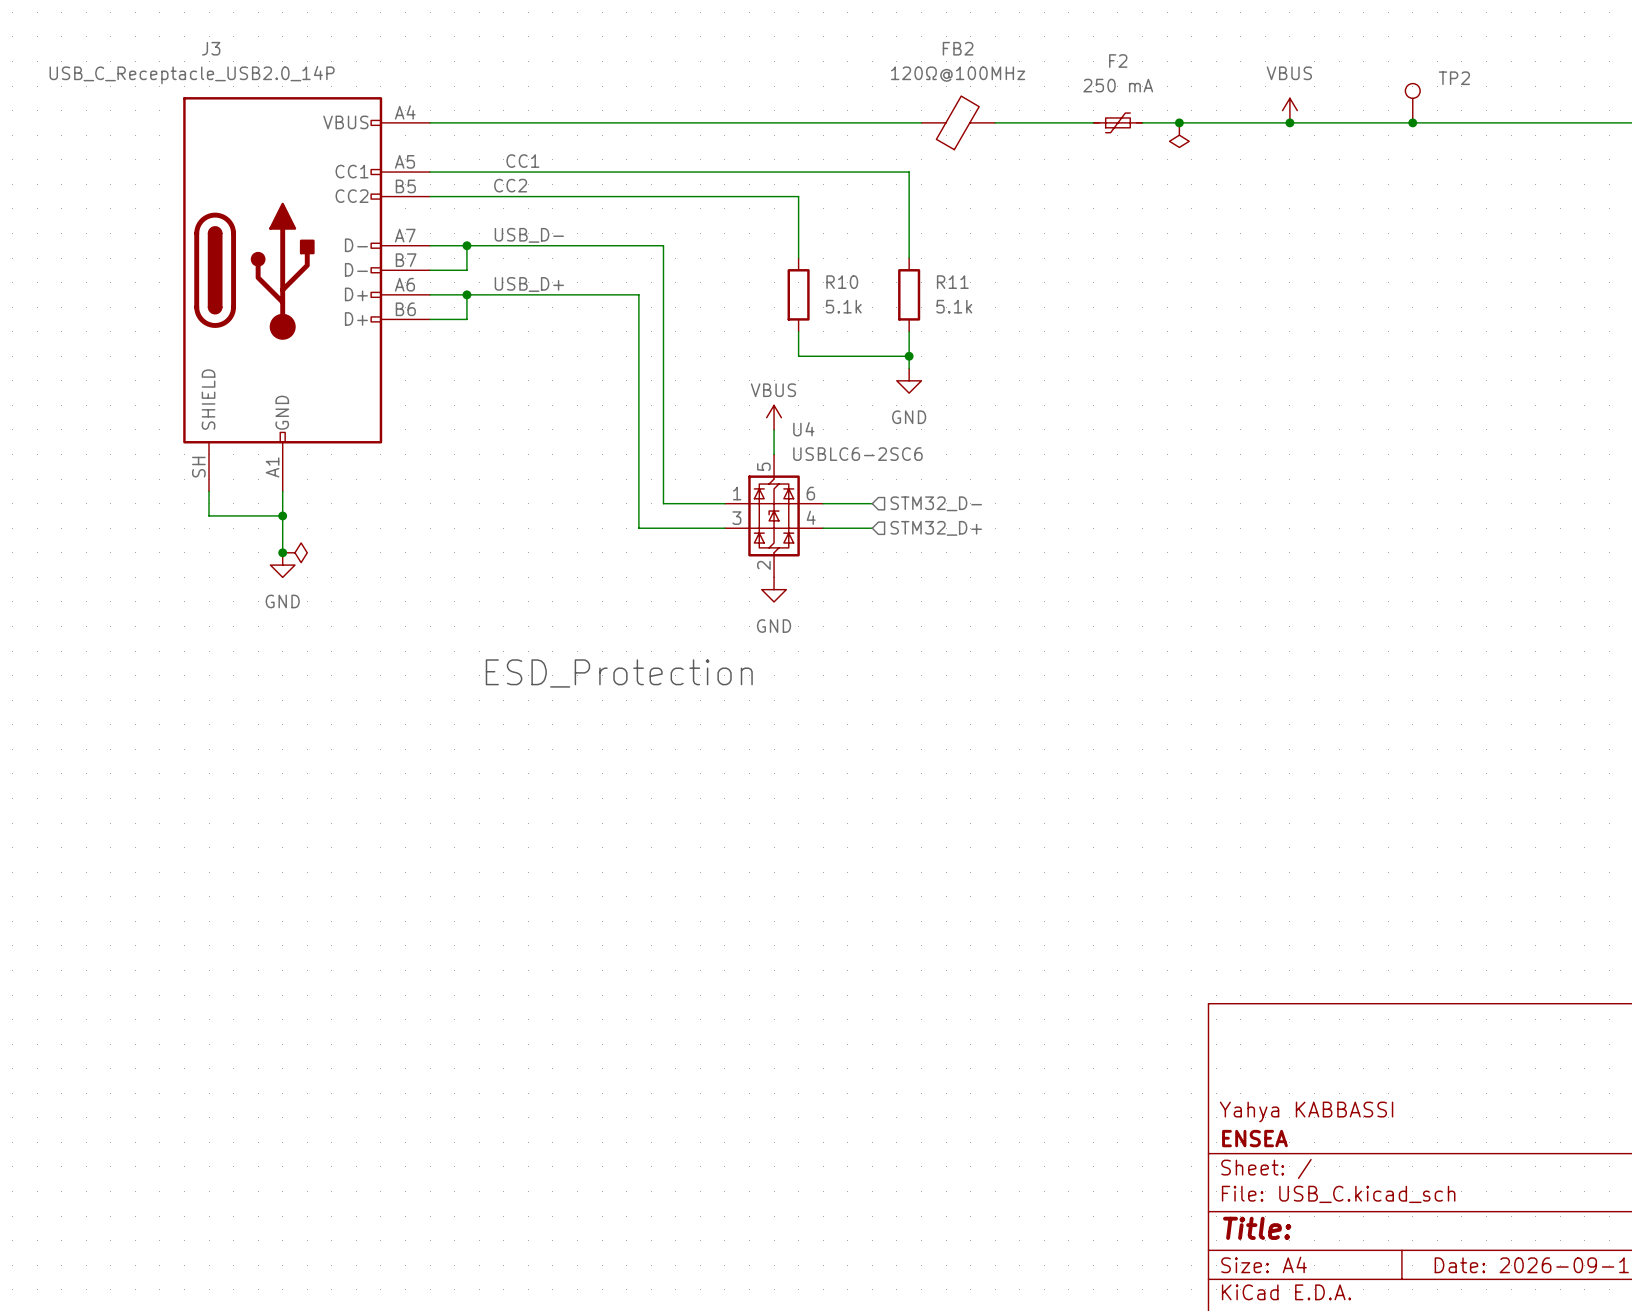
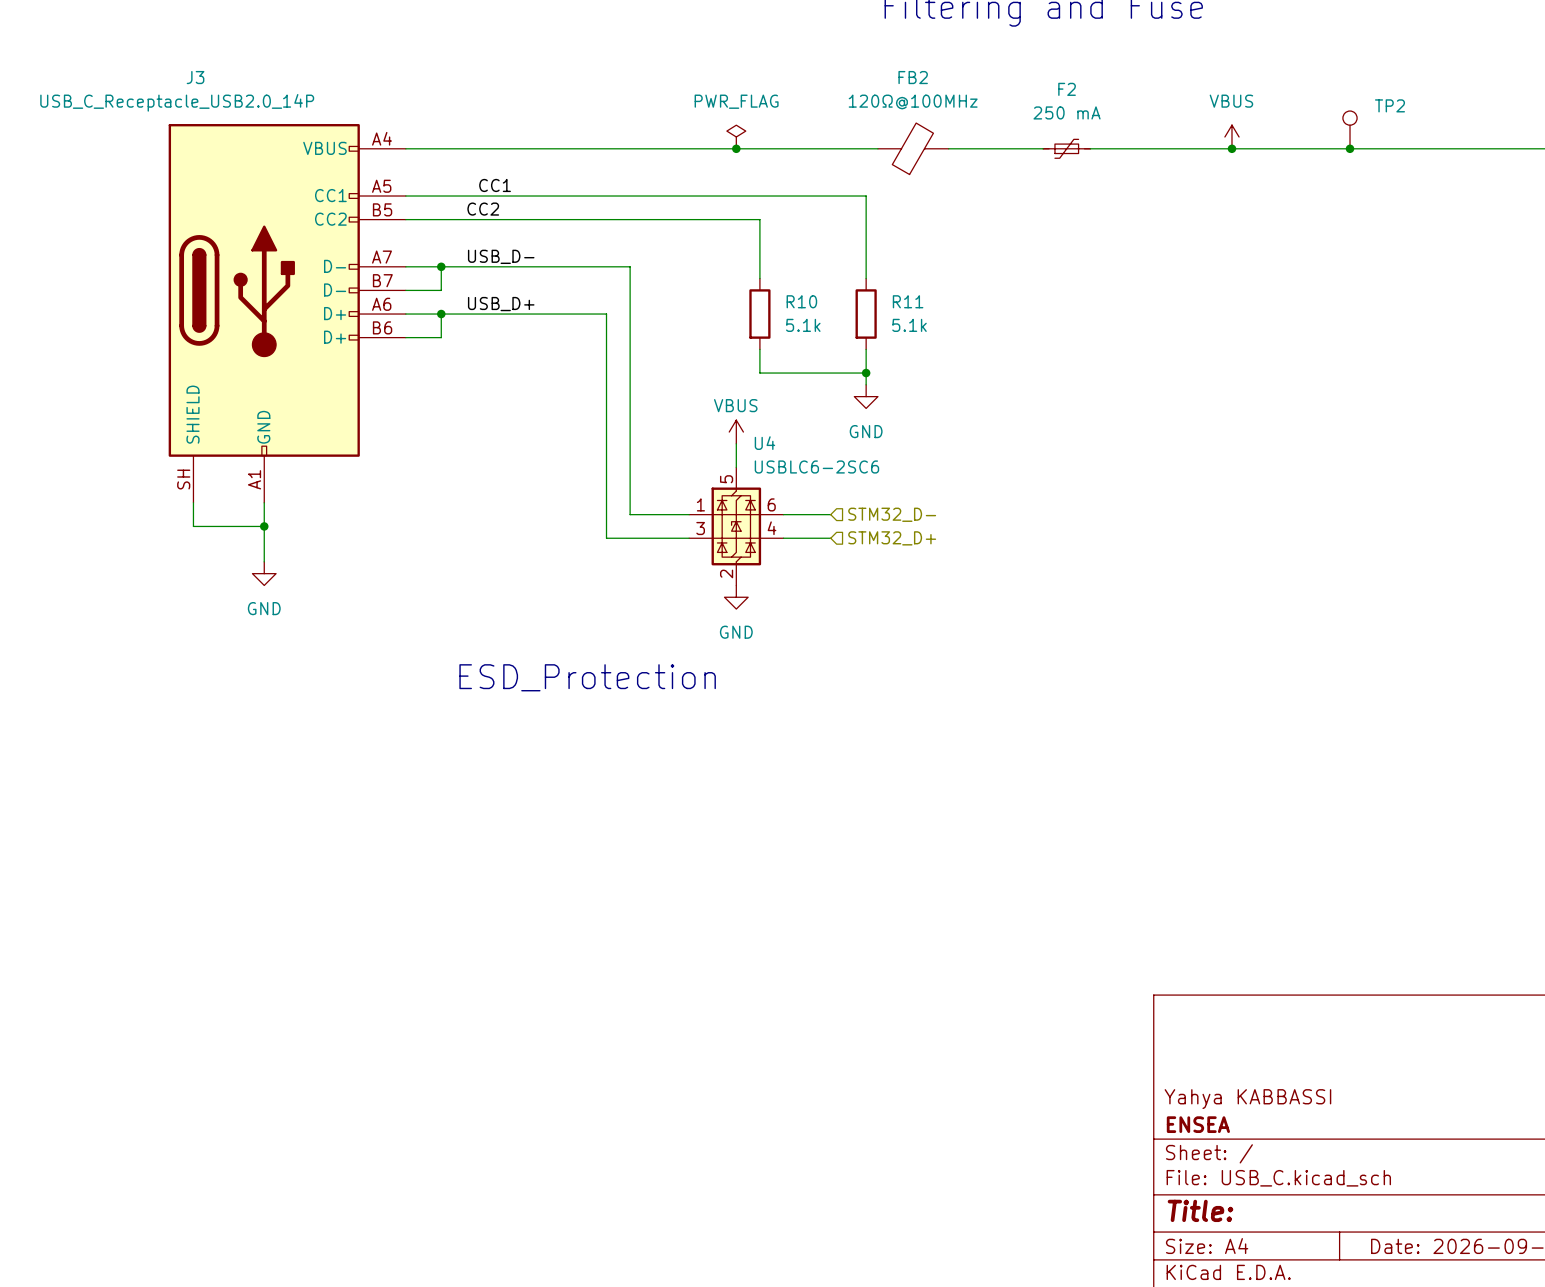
power symbol: none -> PWR_FLAG (736, 136)
junction: none -> (736, 148)
junction: (1179, 122) -> none
power symbol: (1179, 135) -> none
junction: (282, 552) -> none
power symbol: (294, 552) -> none

